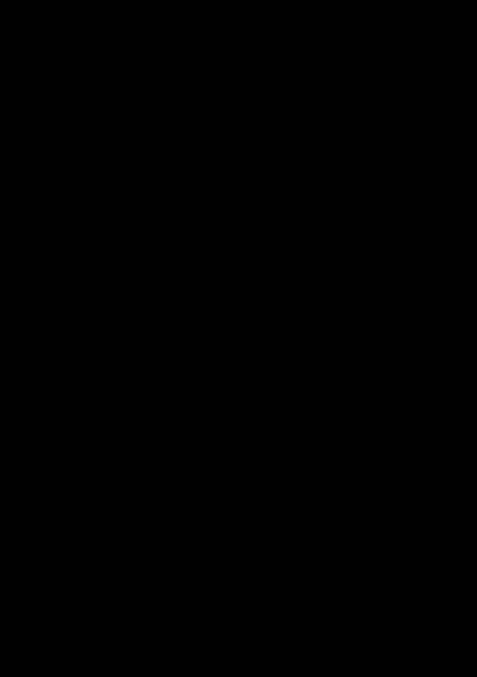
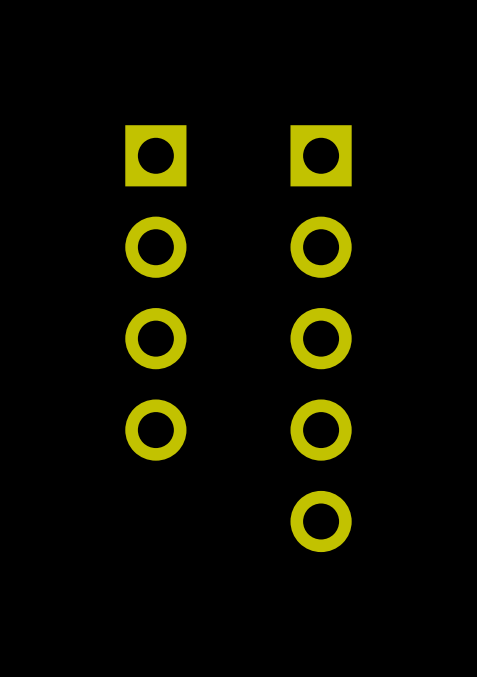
part: none -> (155, 292)
part: none -> (321, 338)

